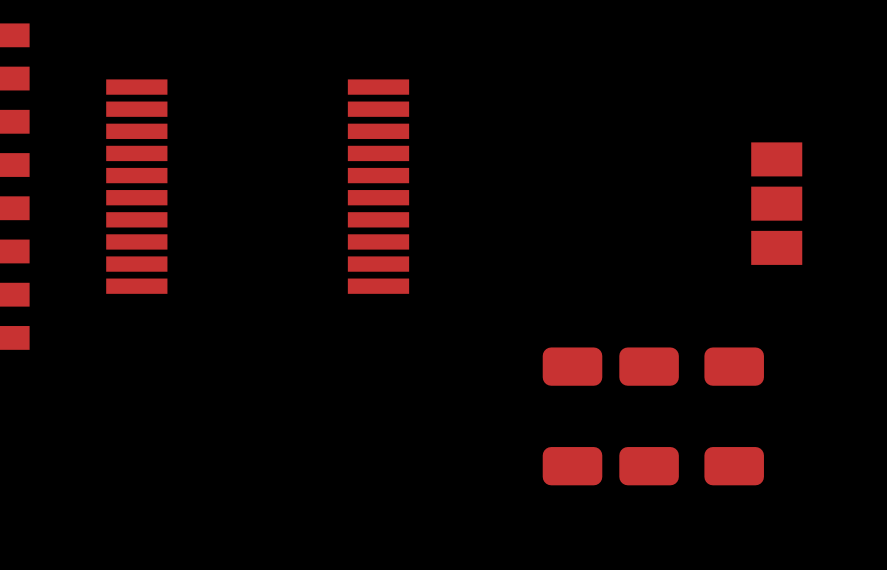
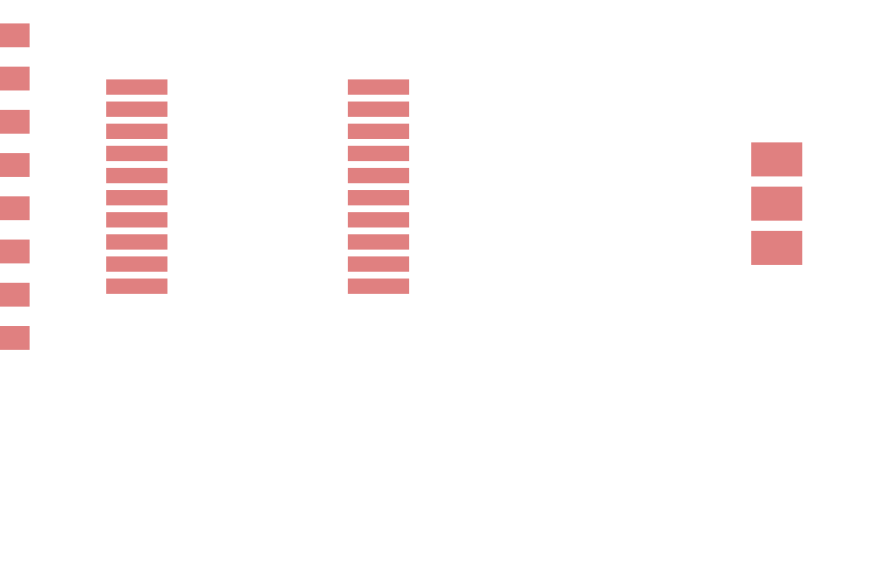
part: (572, 416) -> none
part: (649, 416) -> none
part: (734, 416) -> none

